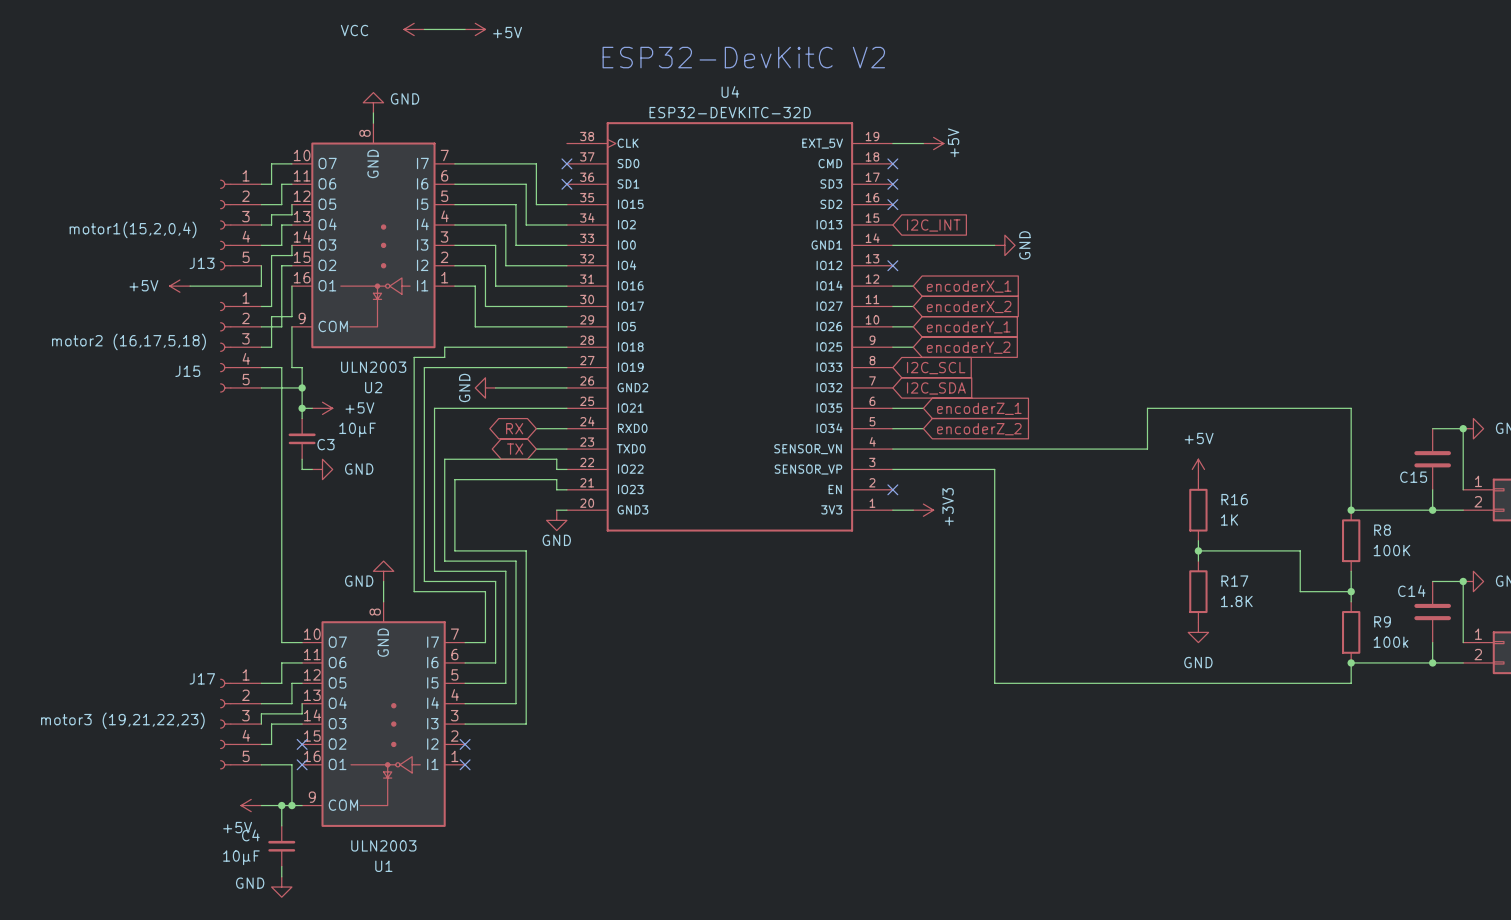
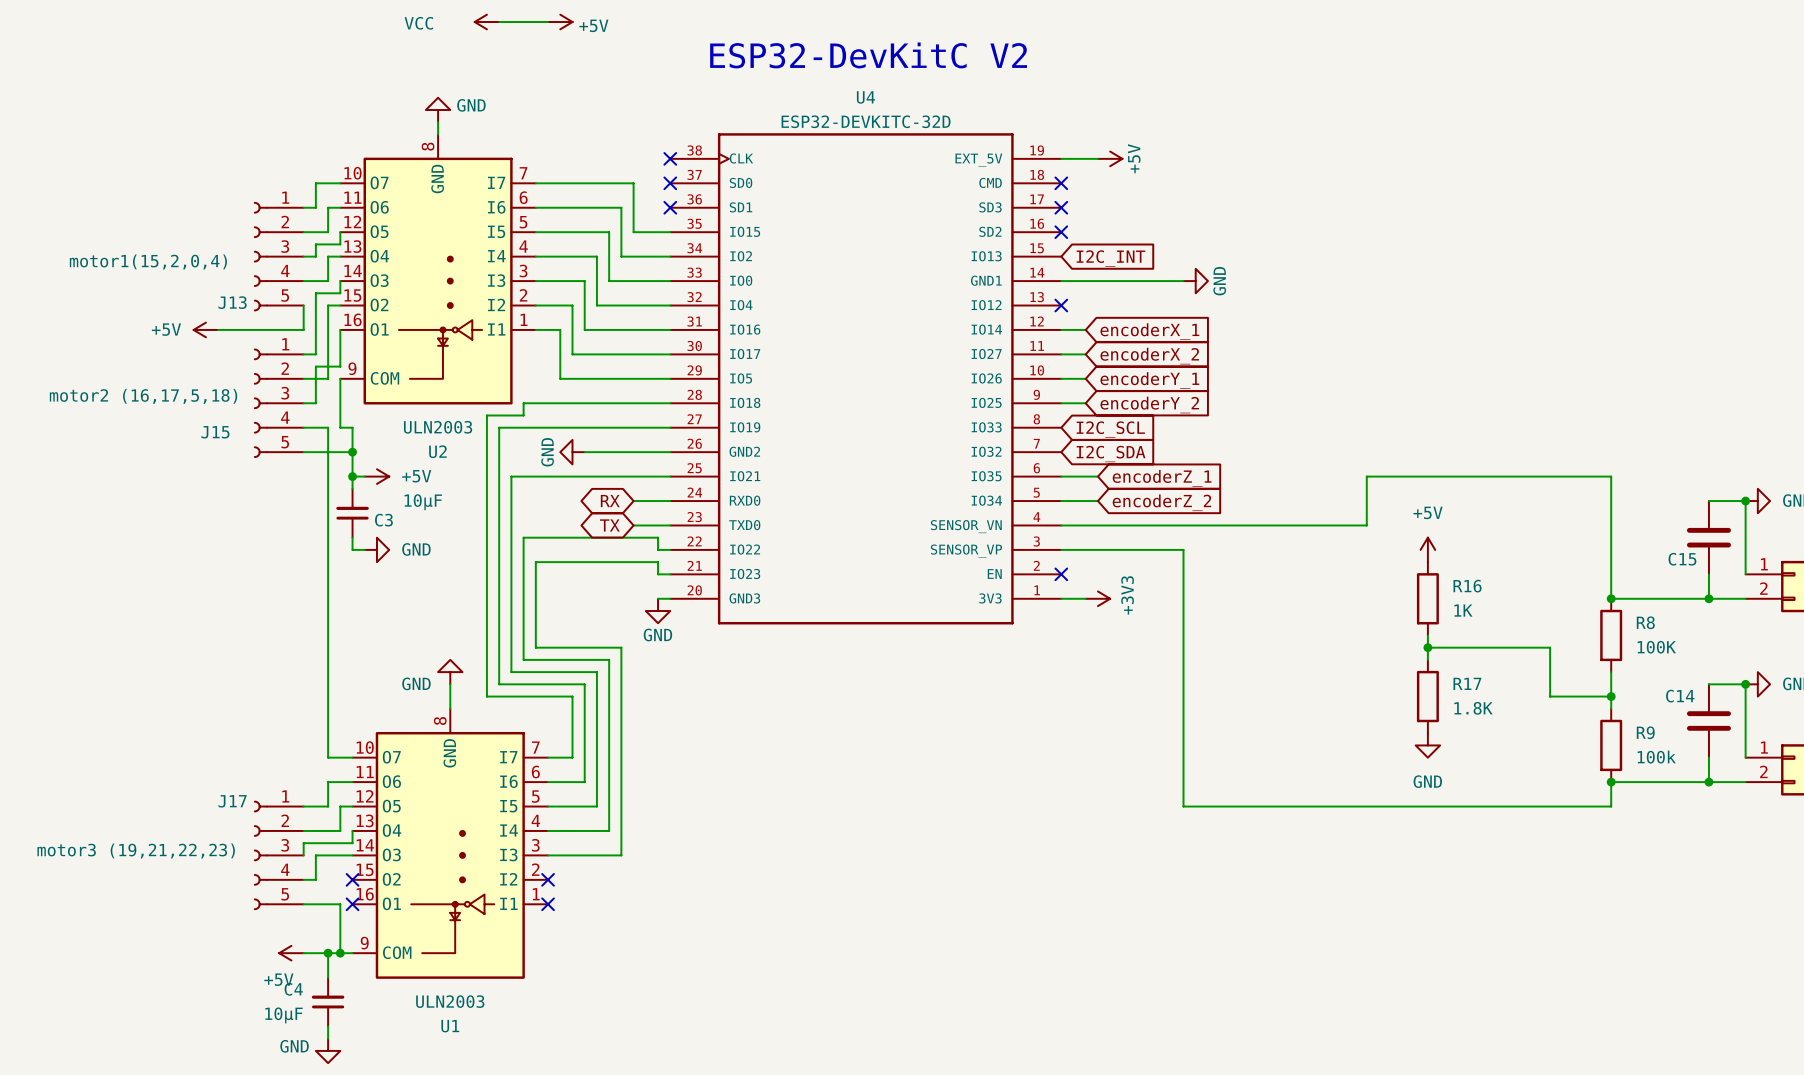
no-connect mark: none -> (670, 158)

